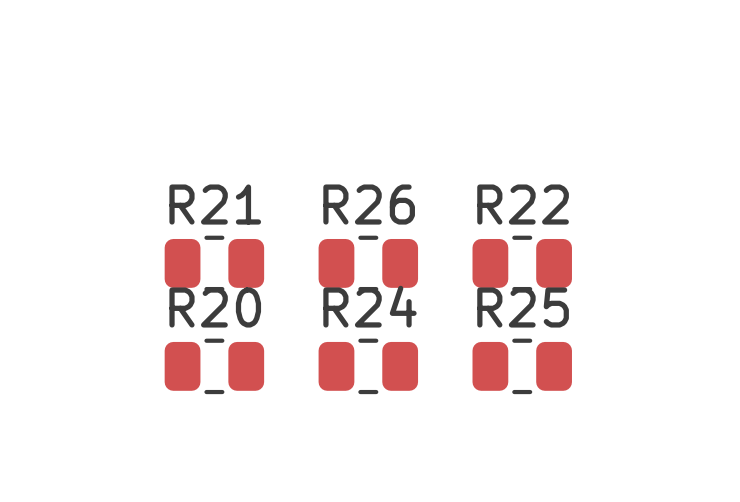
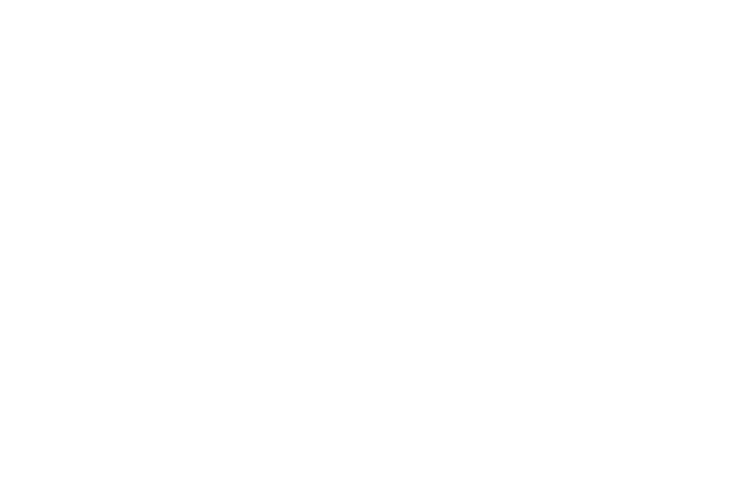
R21: (214, 263) -> none
R26: (368, 263) -> none
R22: (522, 263) -> none
R20: (214, 366) -> none
R24: (368, 366) -> none
R25: (522, 366) -> none

